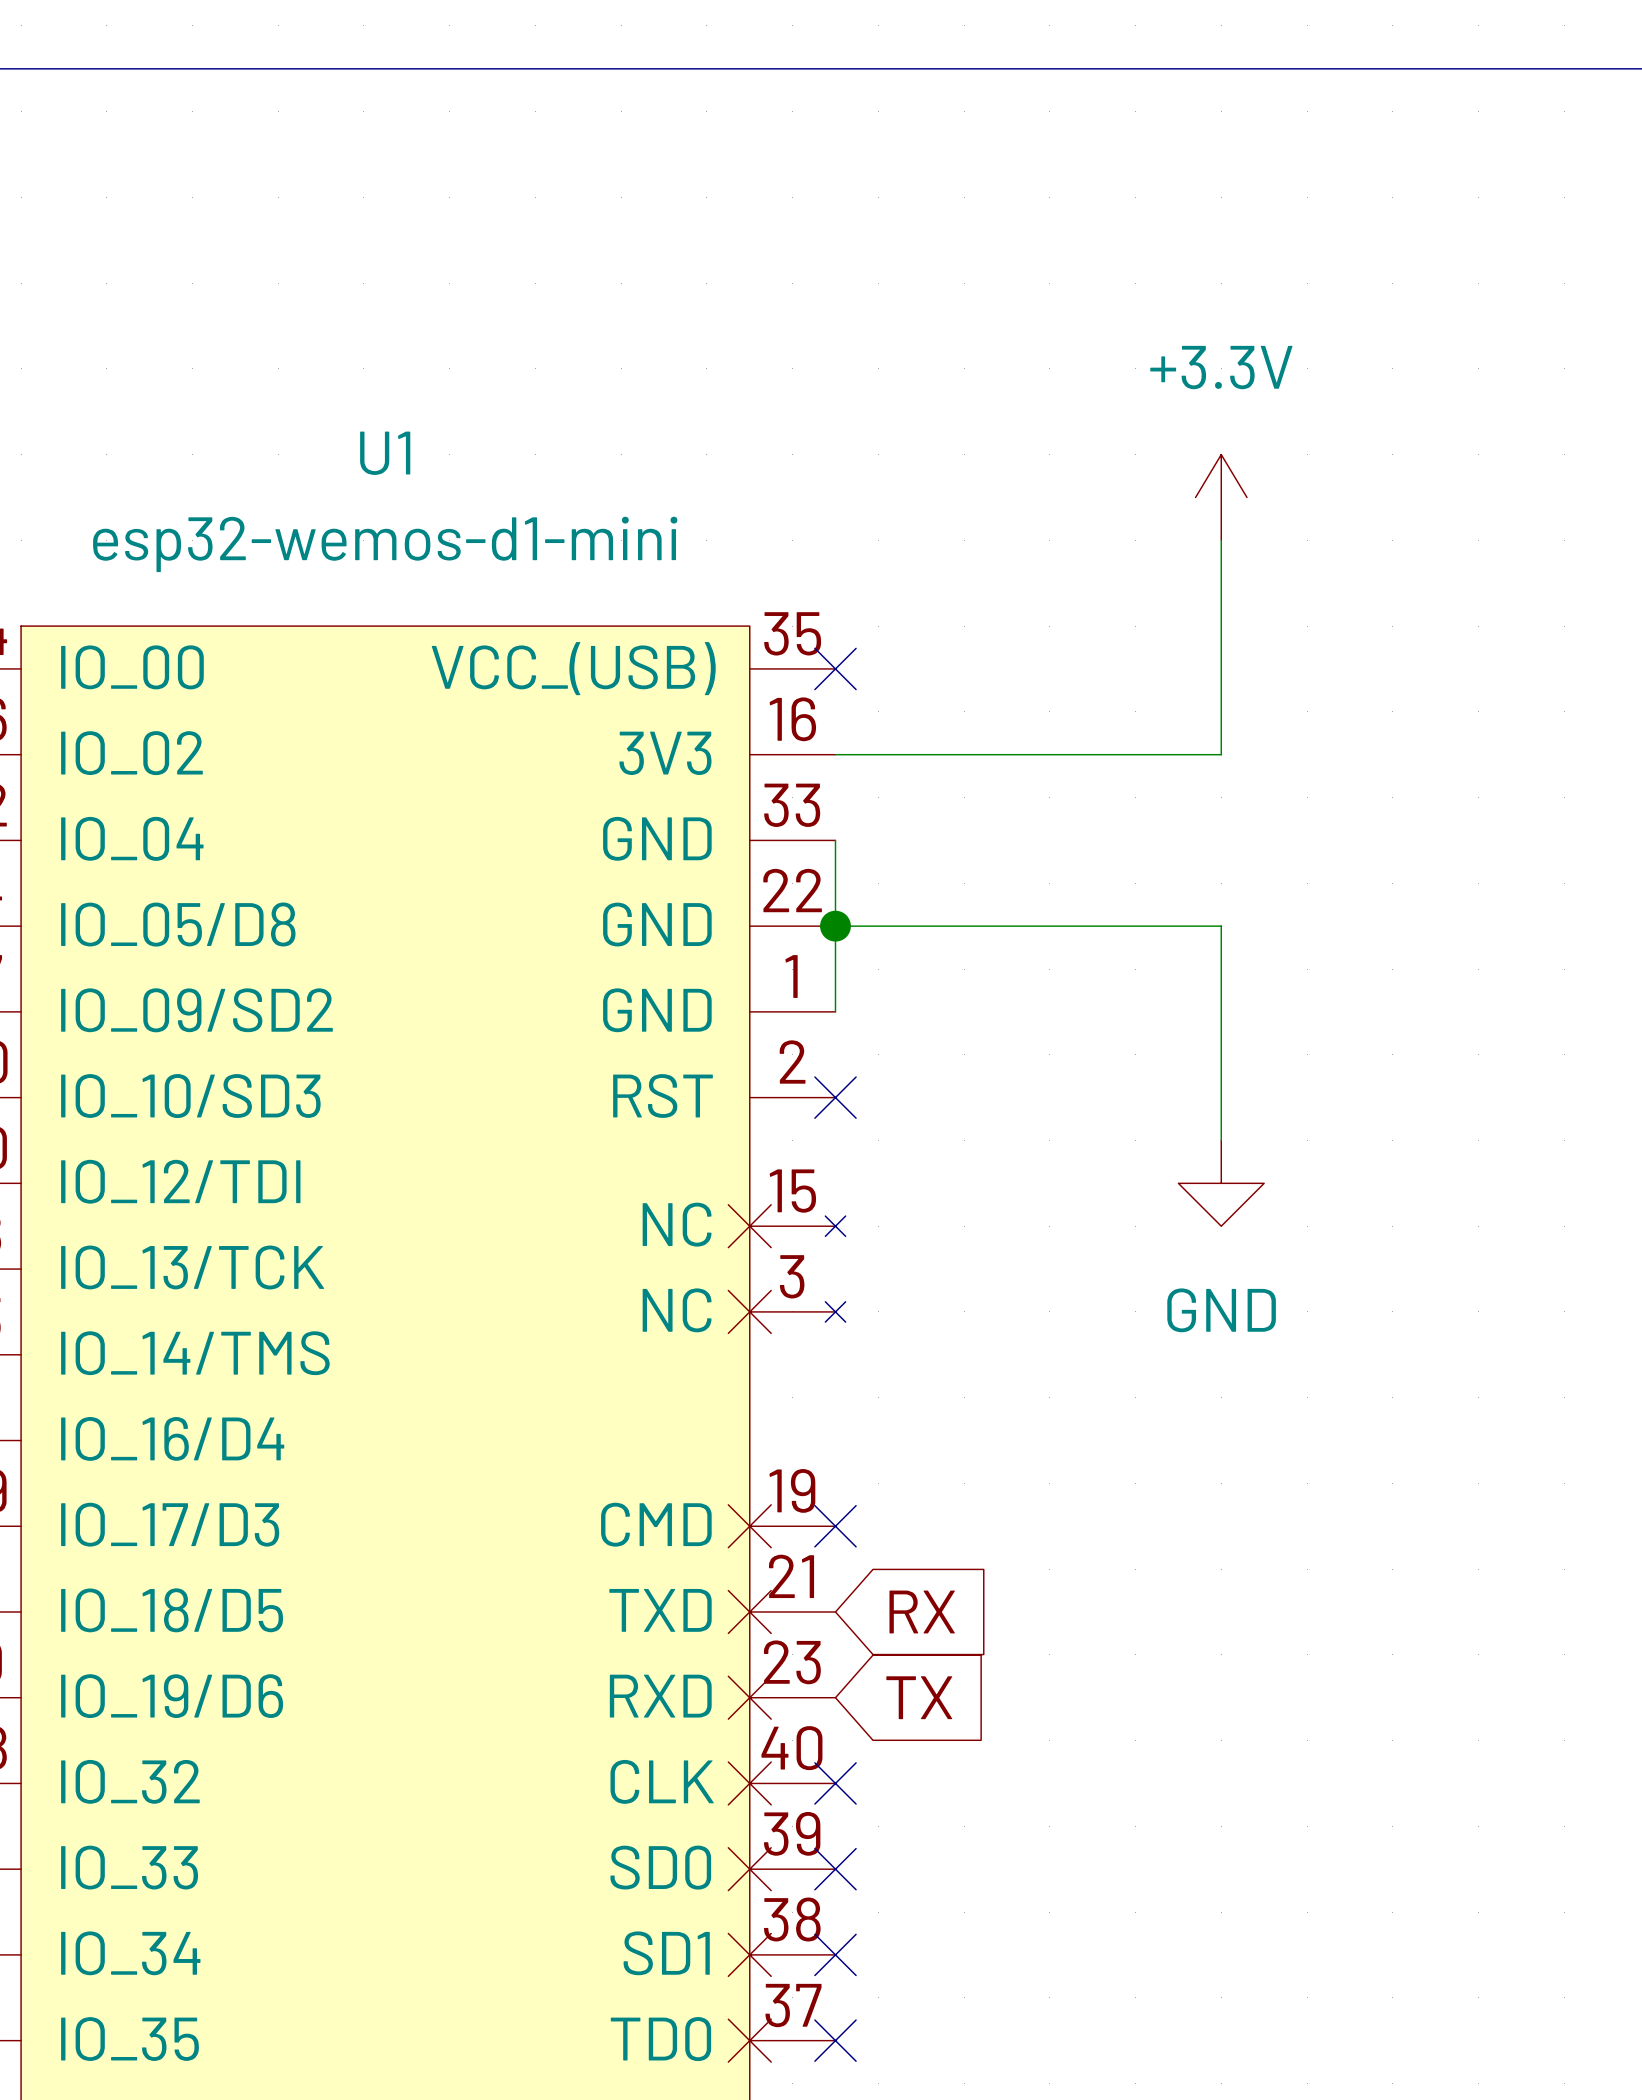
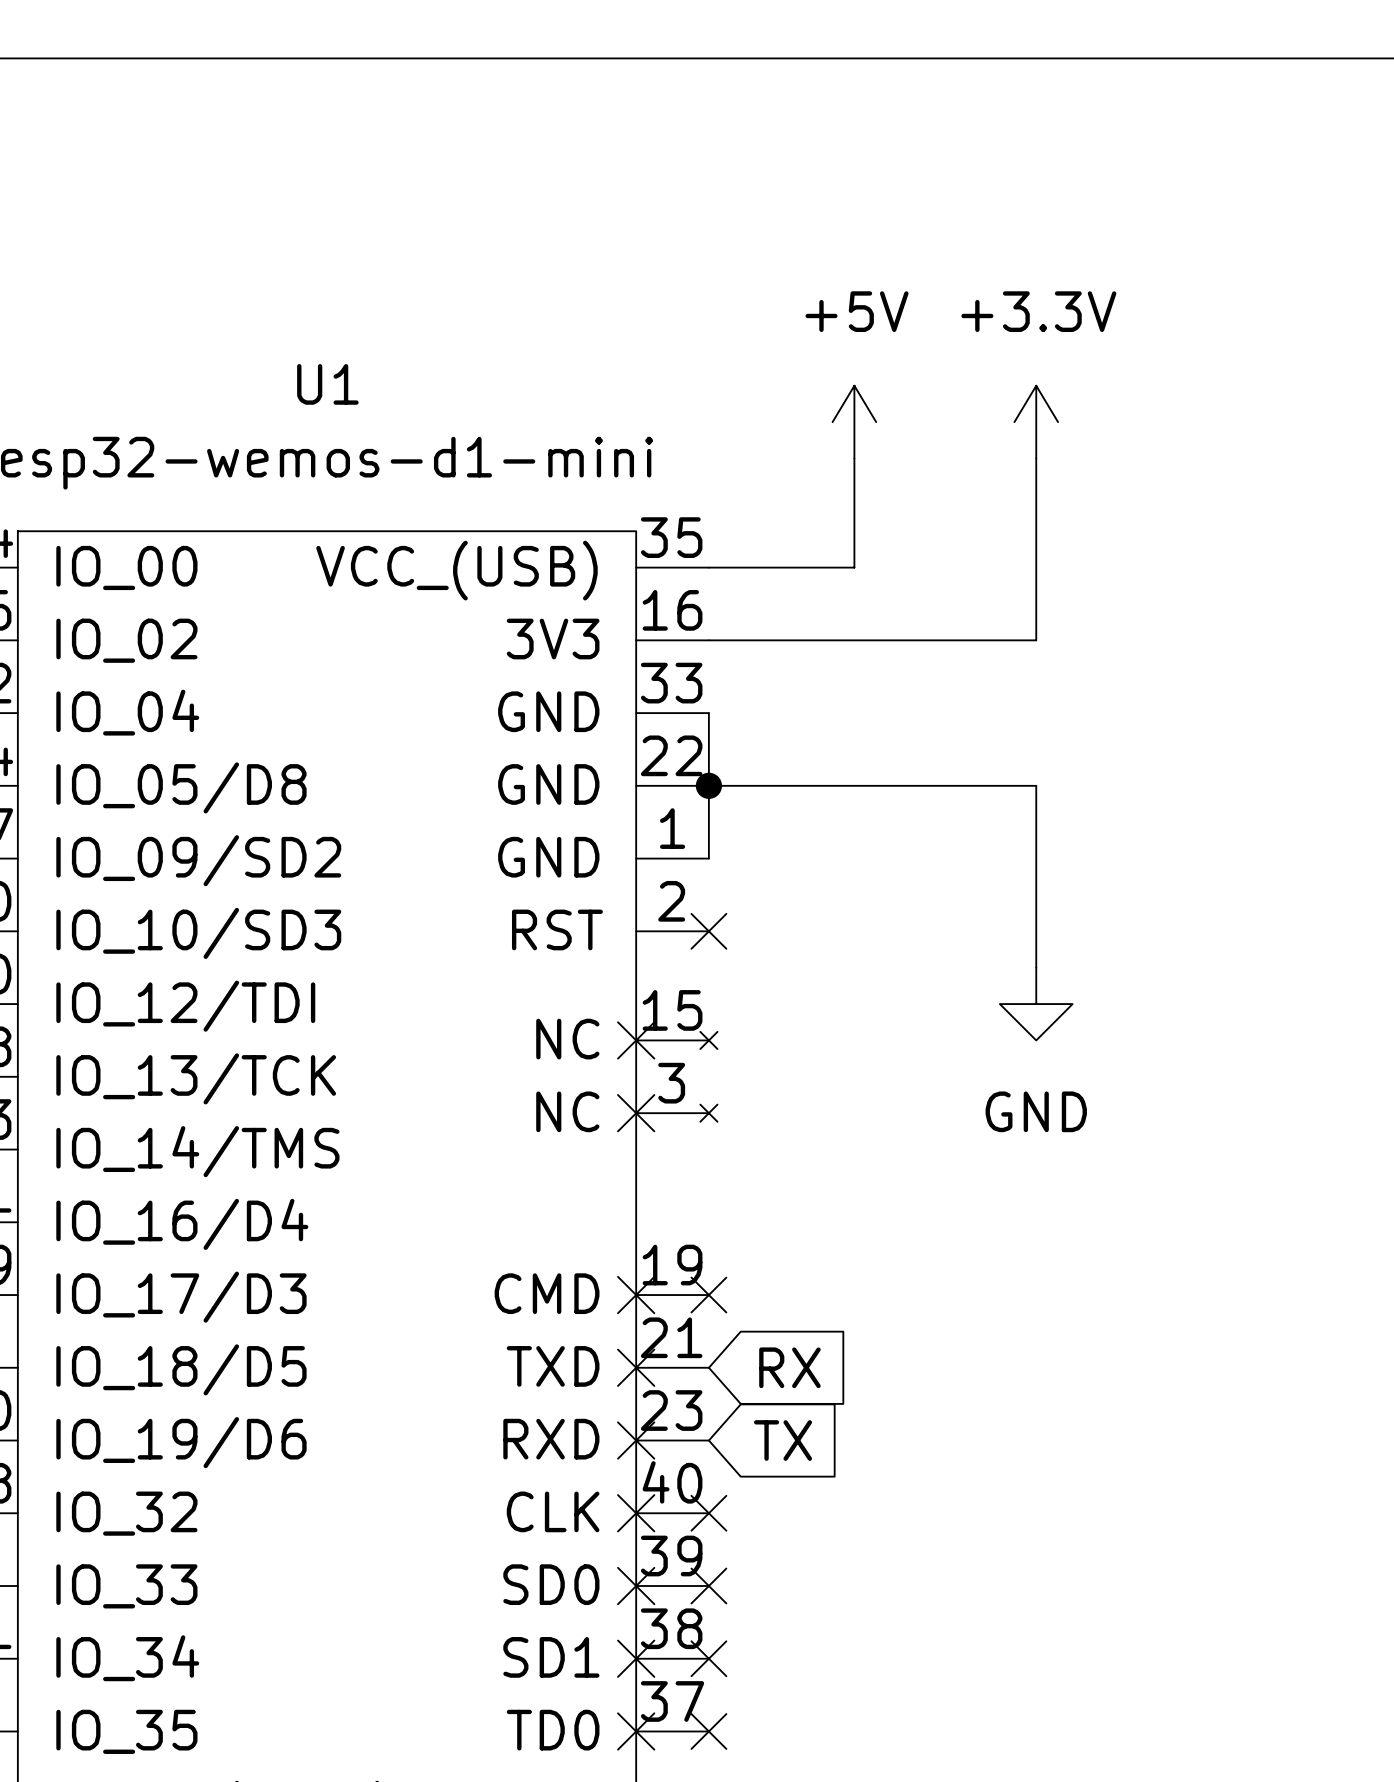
power symbol: none -> +5V (854, 422)
wire: none -> (854, 458) (854, 567) (708, 567)
no-connect mark: (835, 668) -> none

